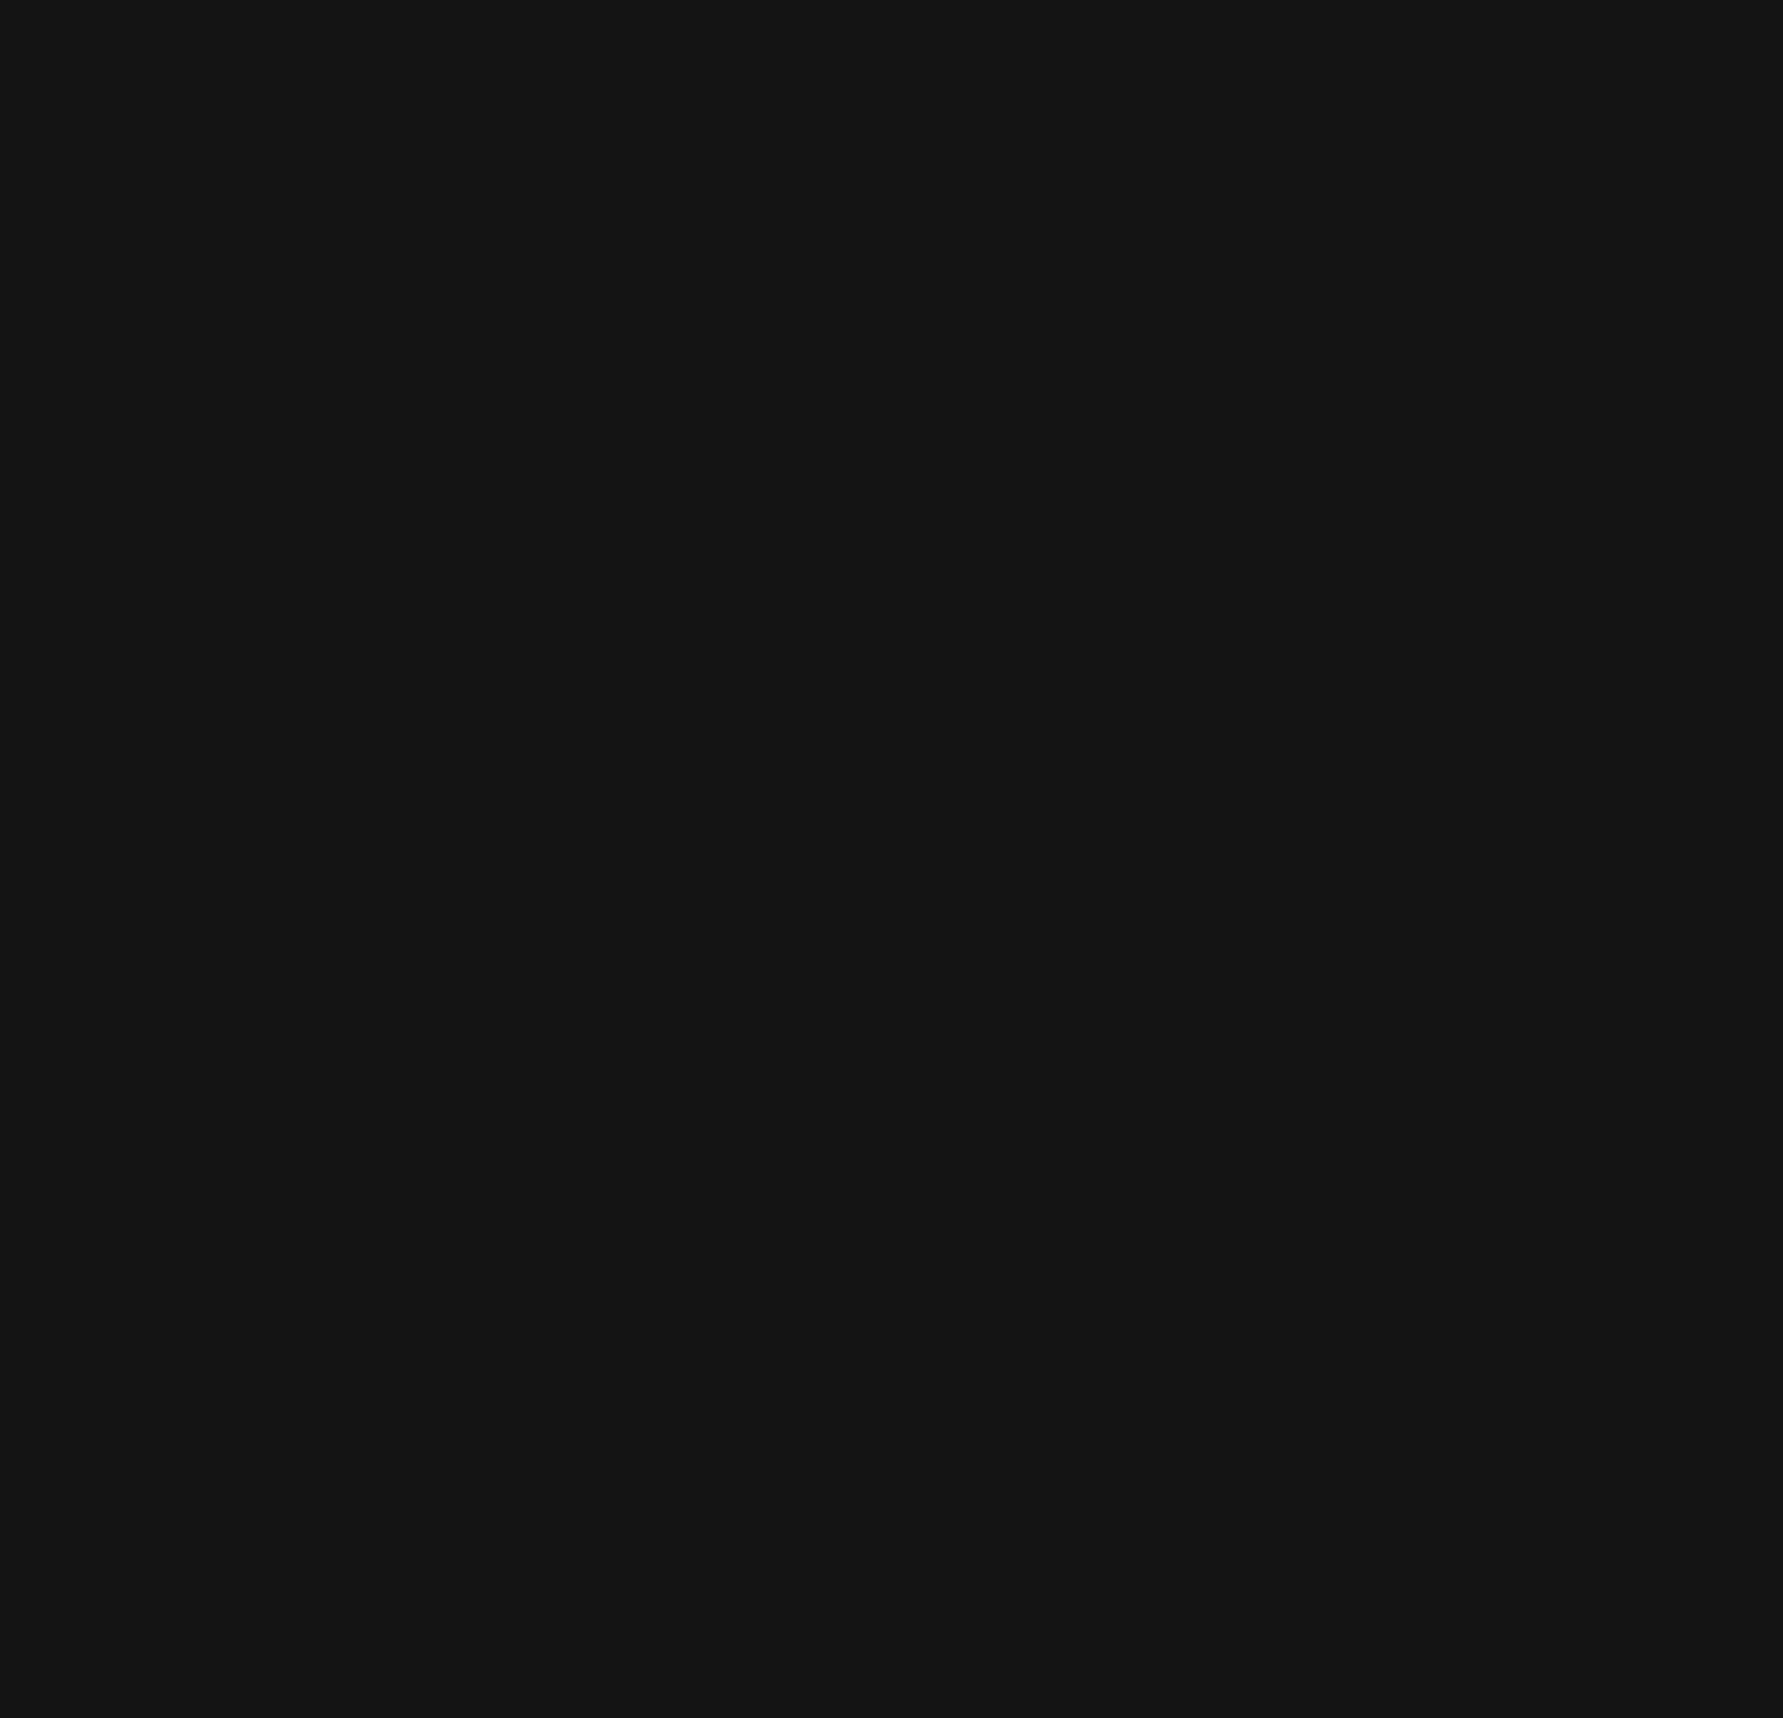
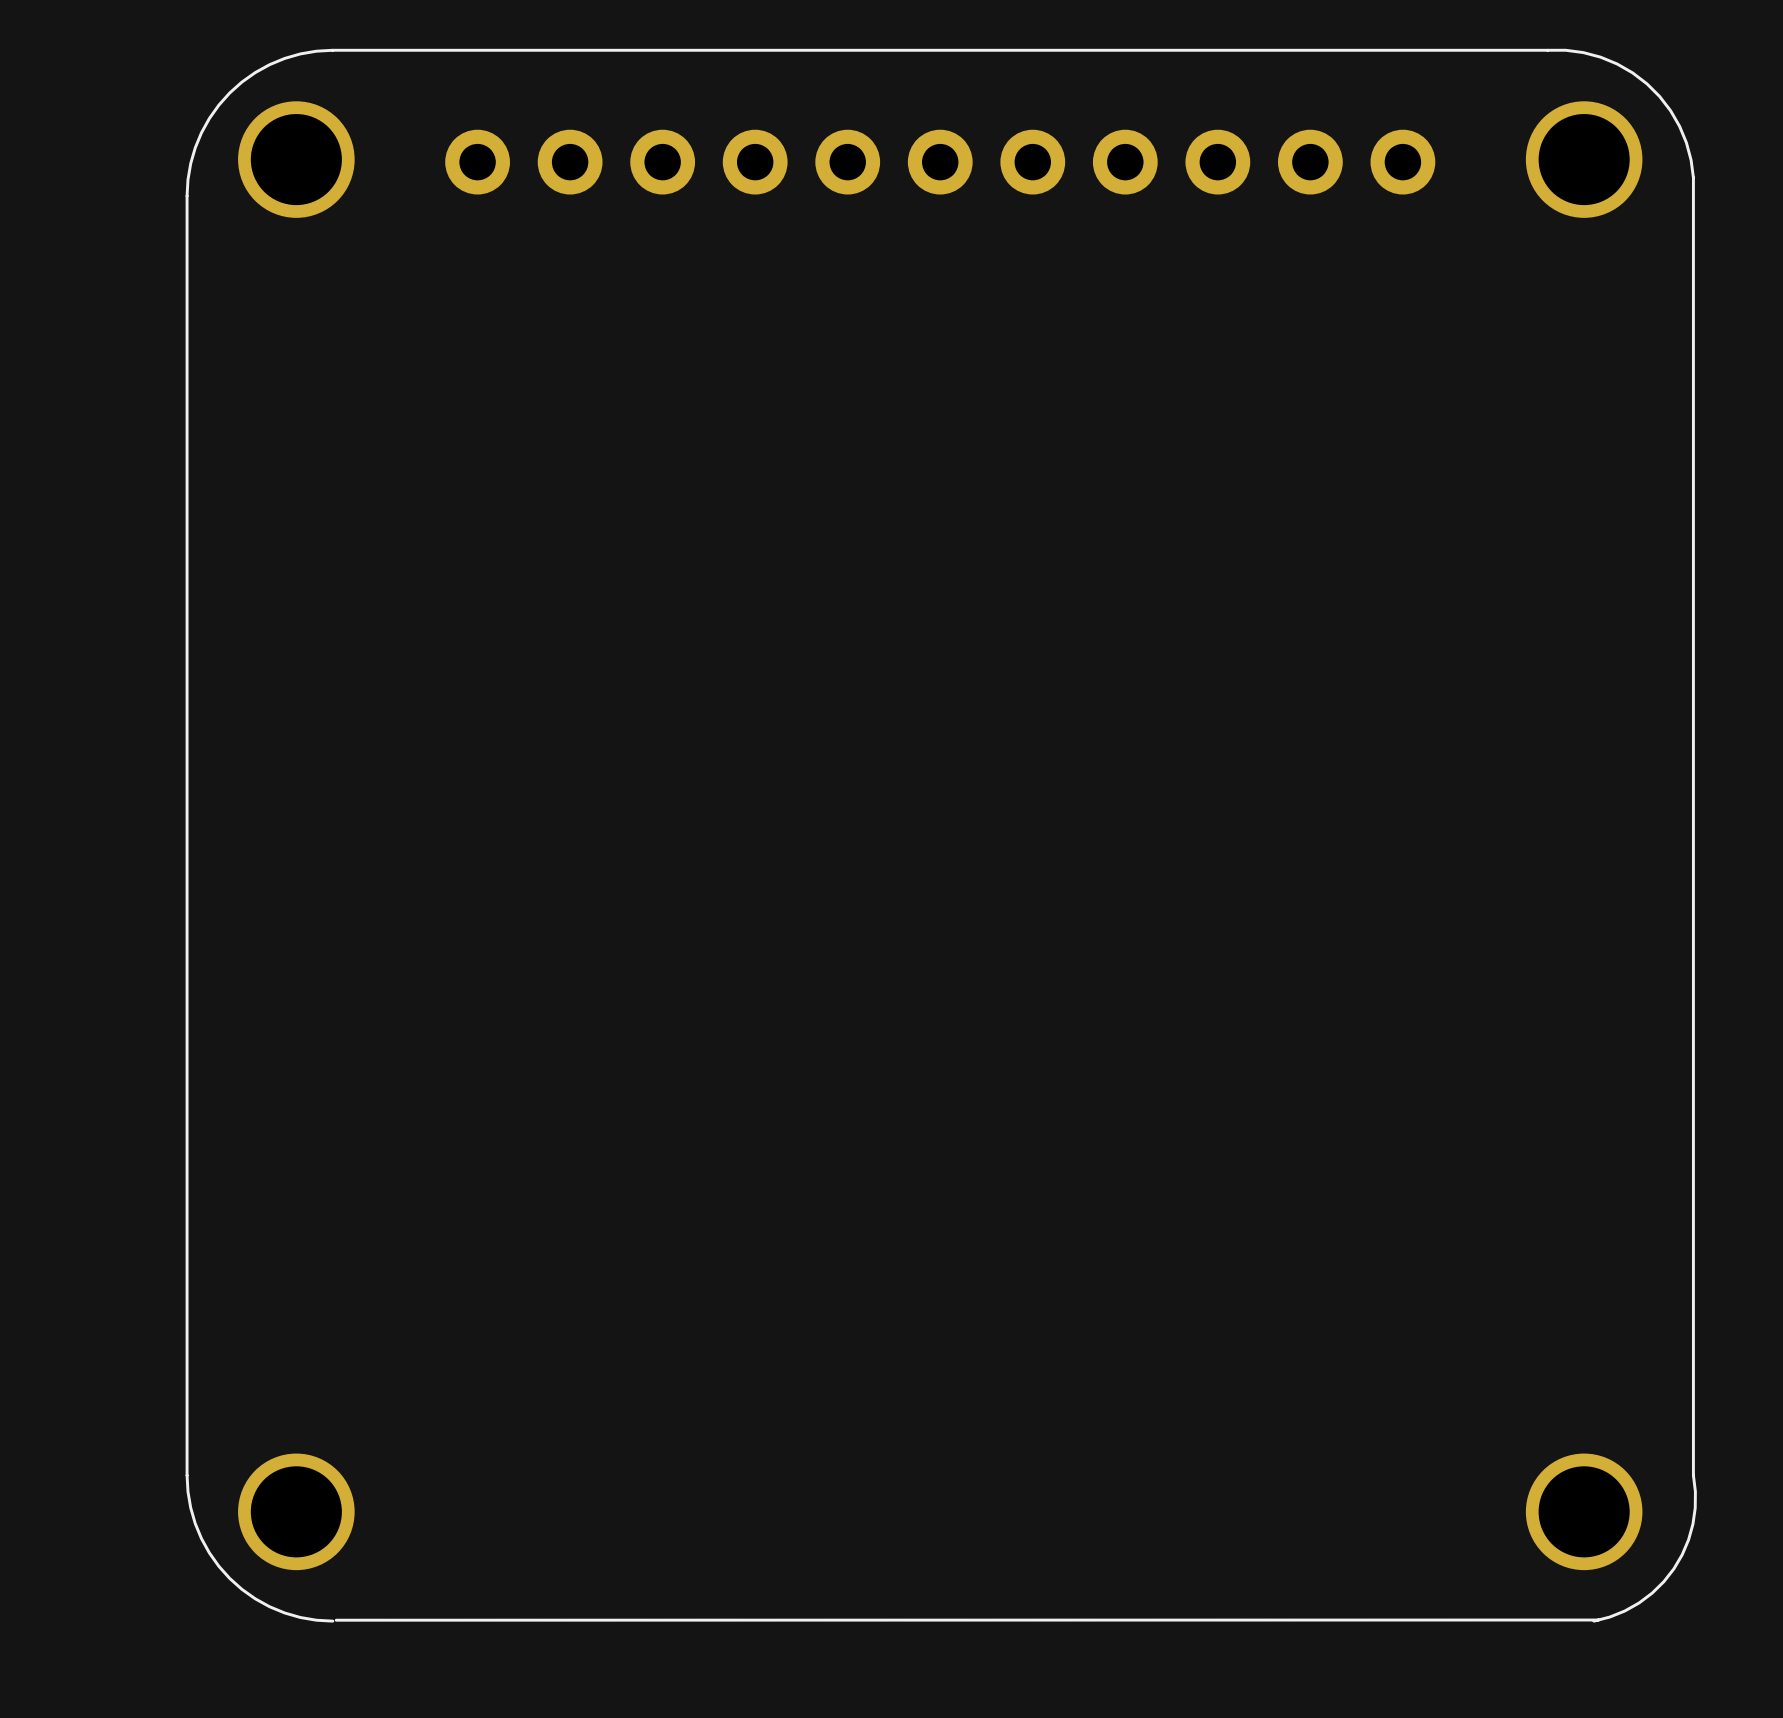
part: none -> (941, 835)

